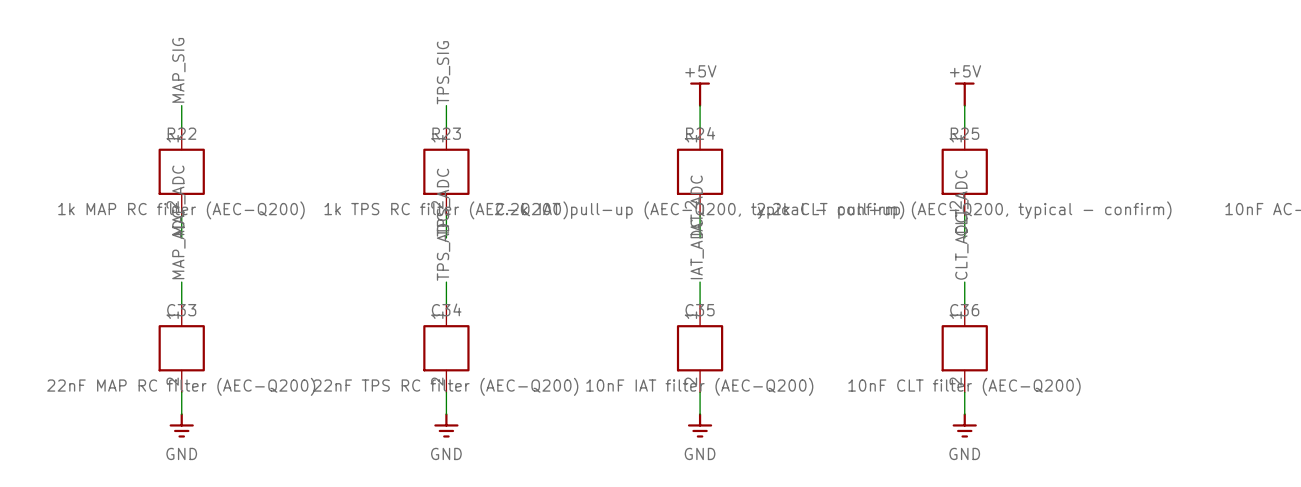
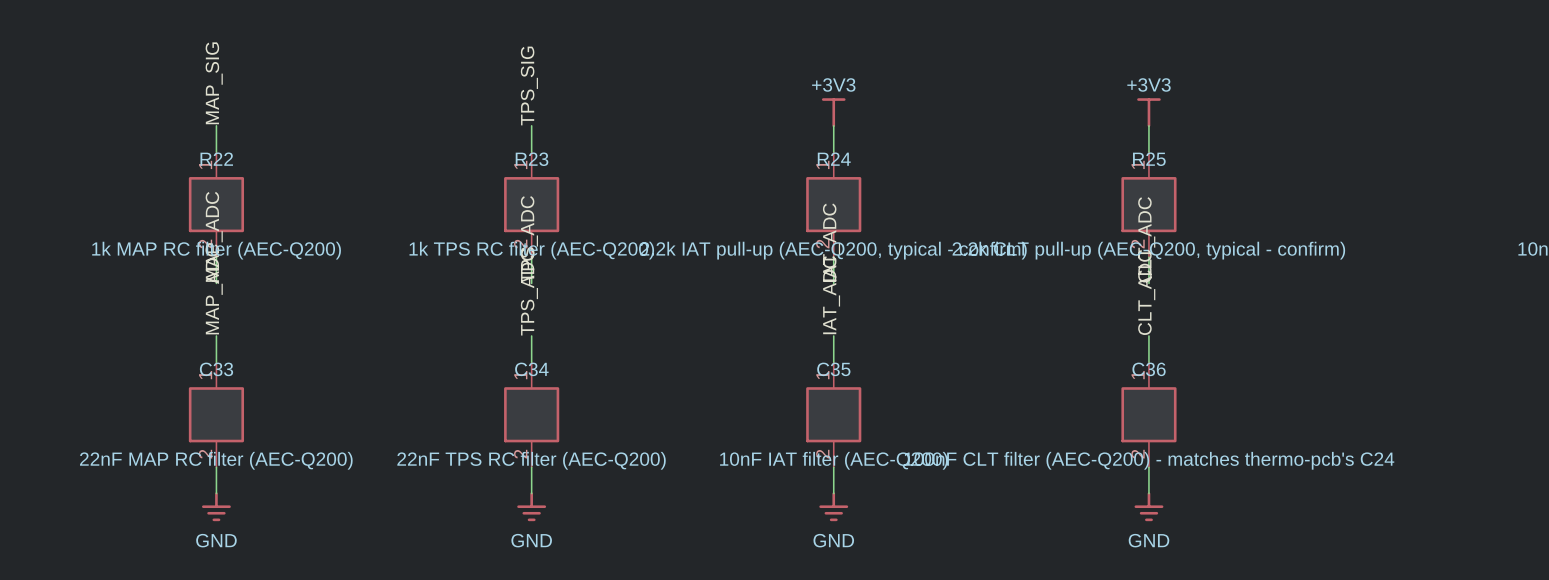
power symbol: +5V (700, 94) -> +3V3 (833, 112)
power symbol: +5V (964, 94) -> +3V3 (1148, 112)
C36 value: 10nF CLT filter (AEC-Q200) (964, 386) -> 100nF CLT filter (AEC-Q200) - matches thermo-pcb's C24 (1149, 460)

